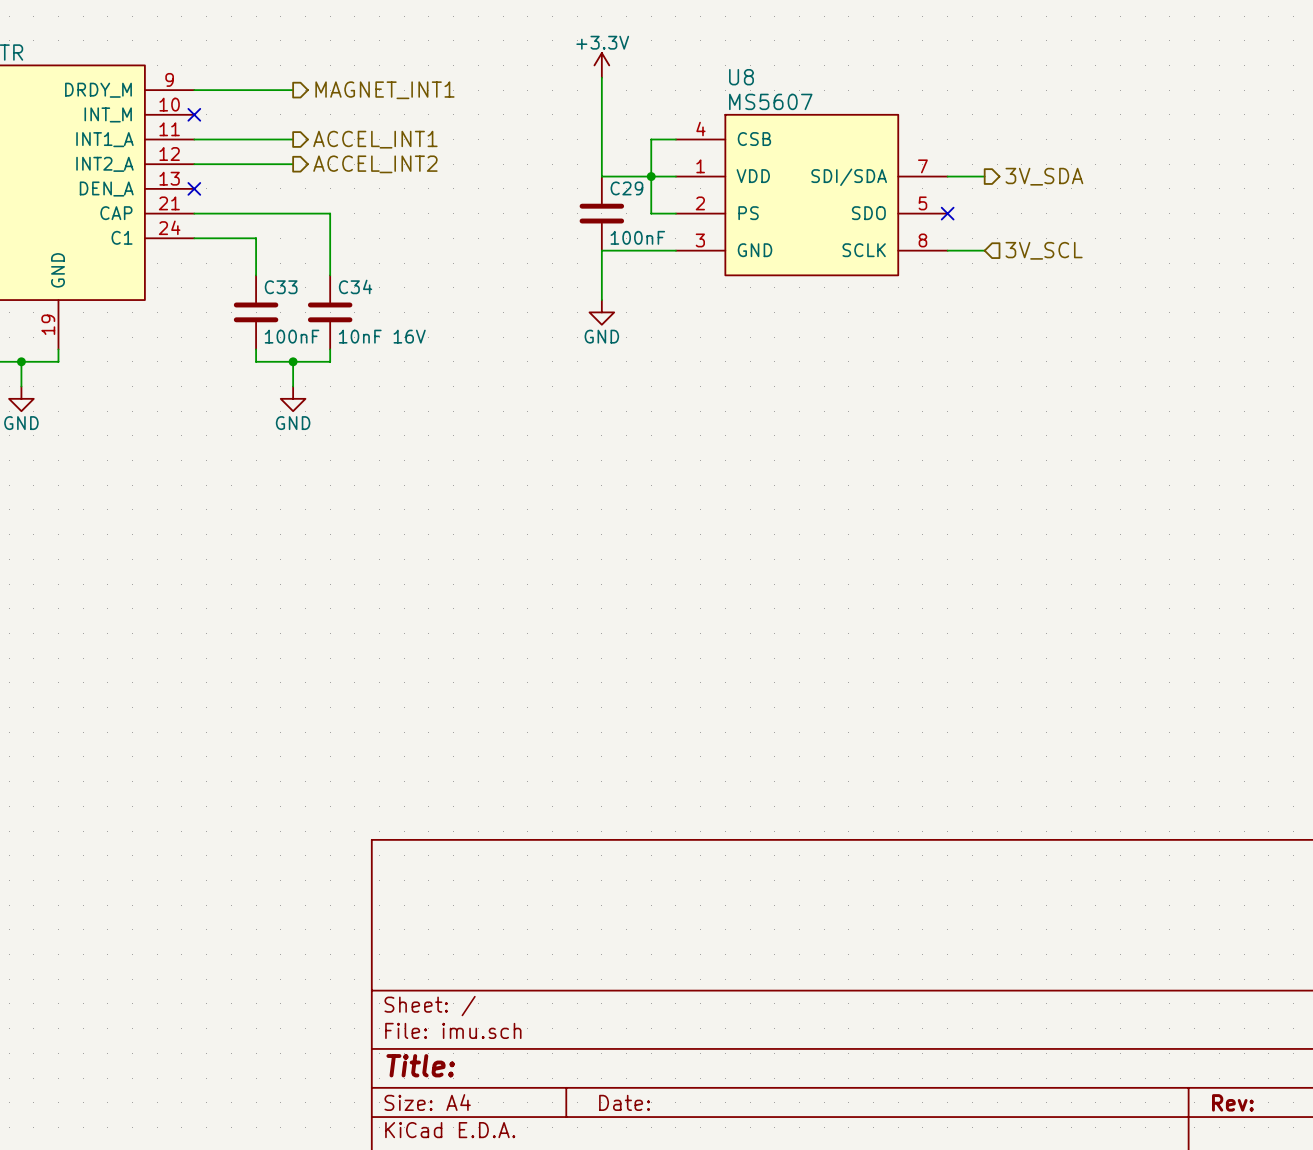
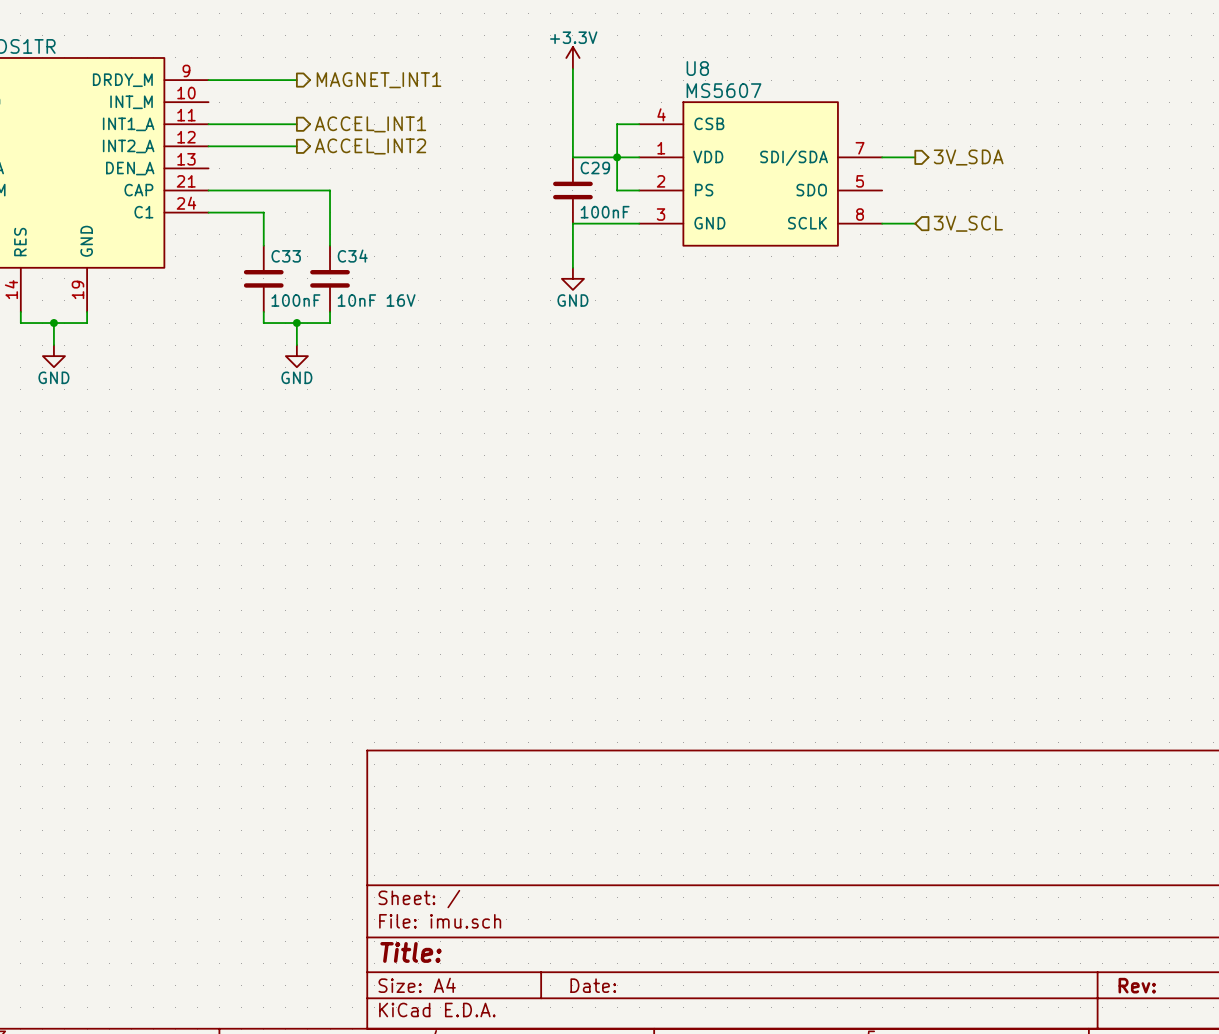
no-connect mark: (194, 114) -> none
no-connect mark: (194, 188) -> none
no-connect mark: (947, 213) -> none

